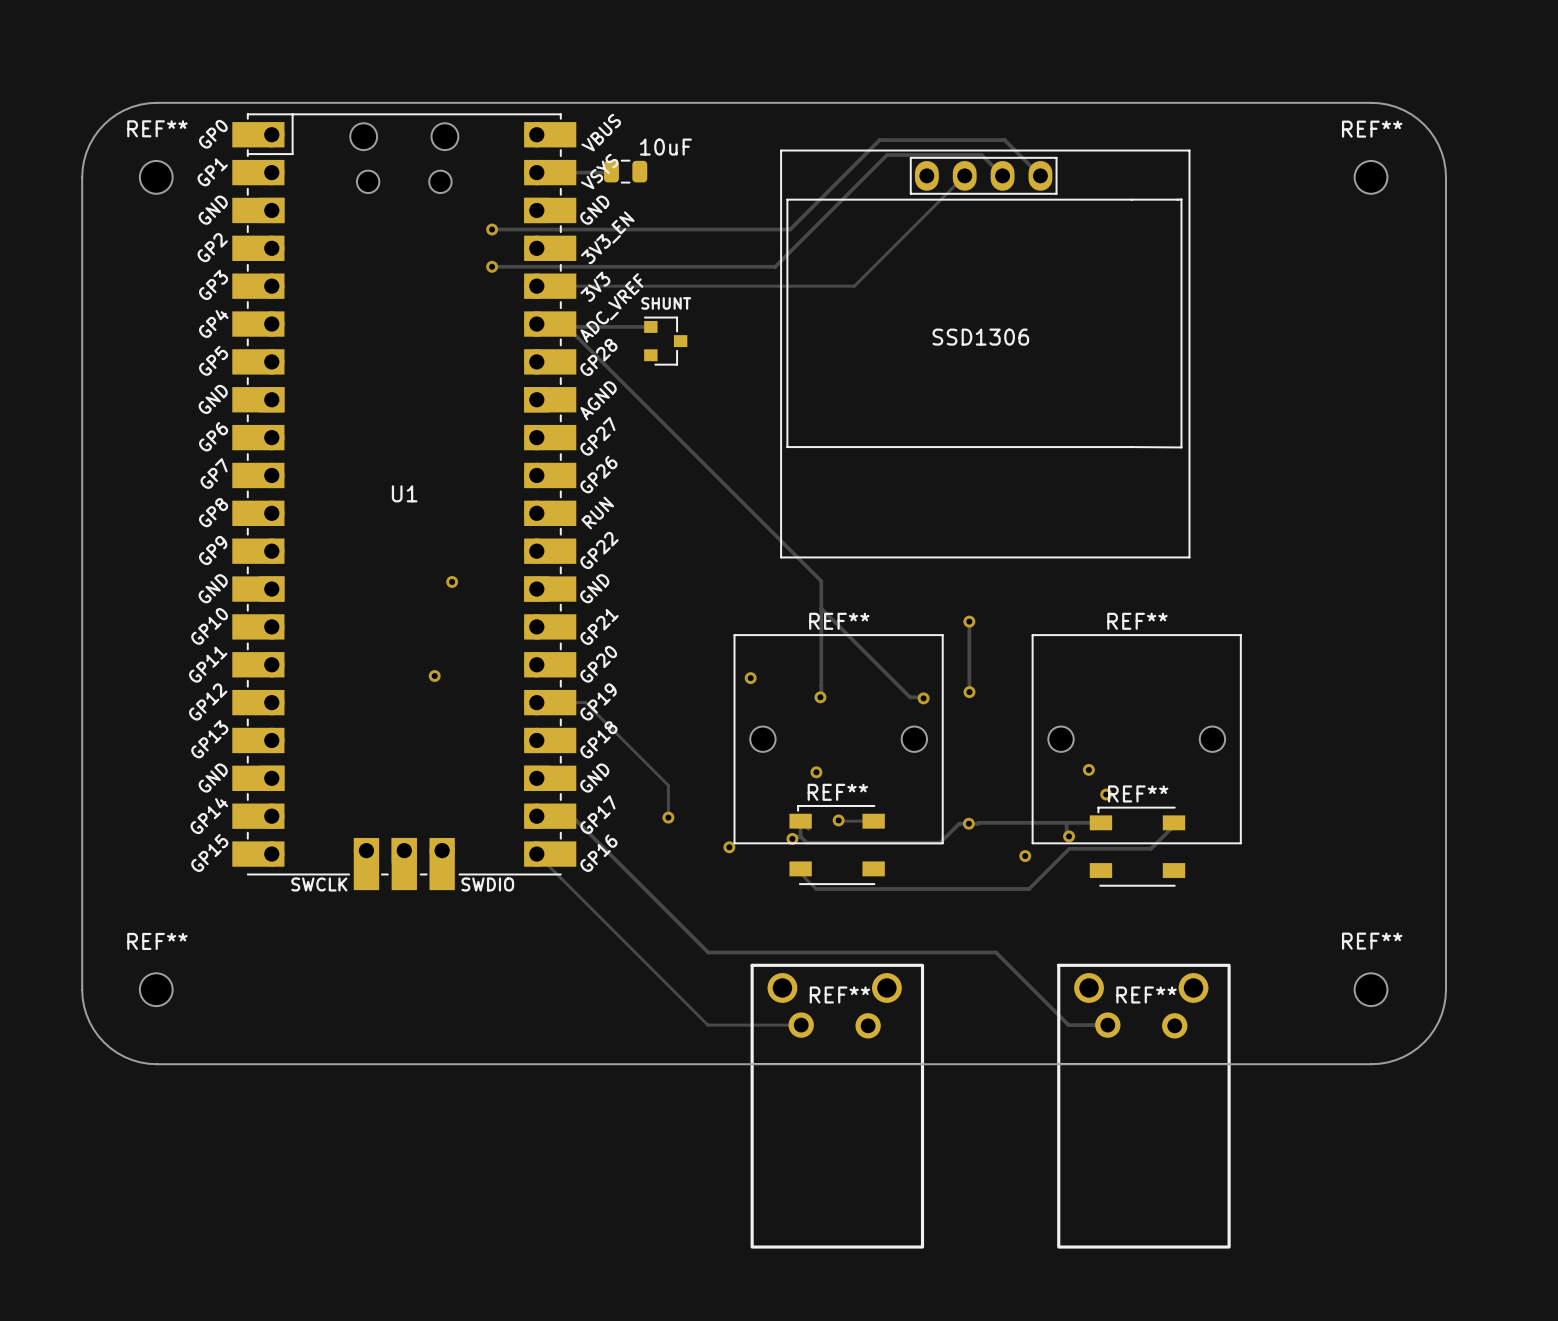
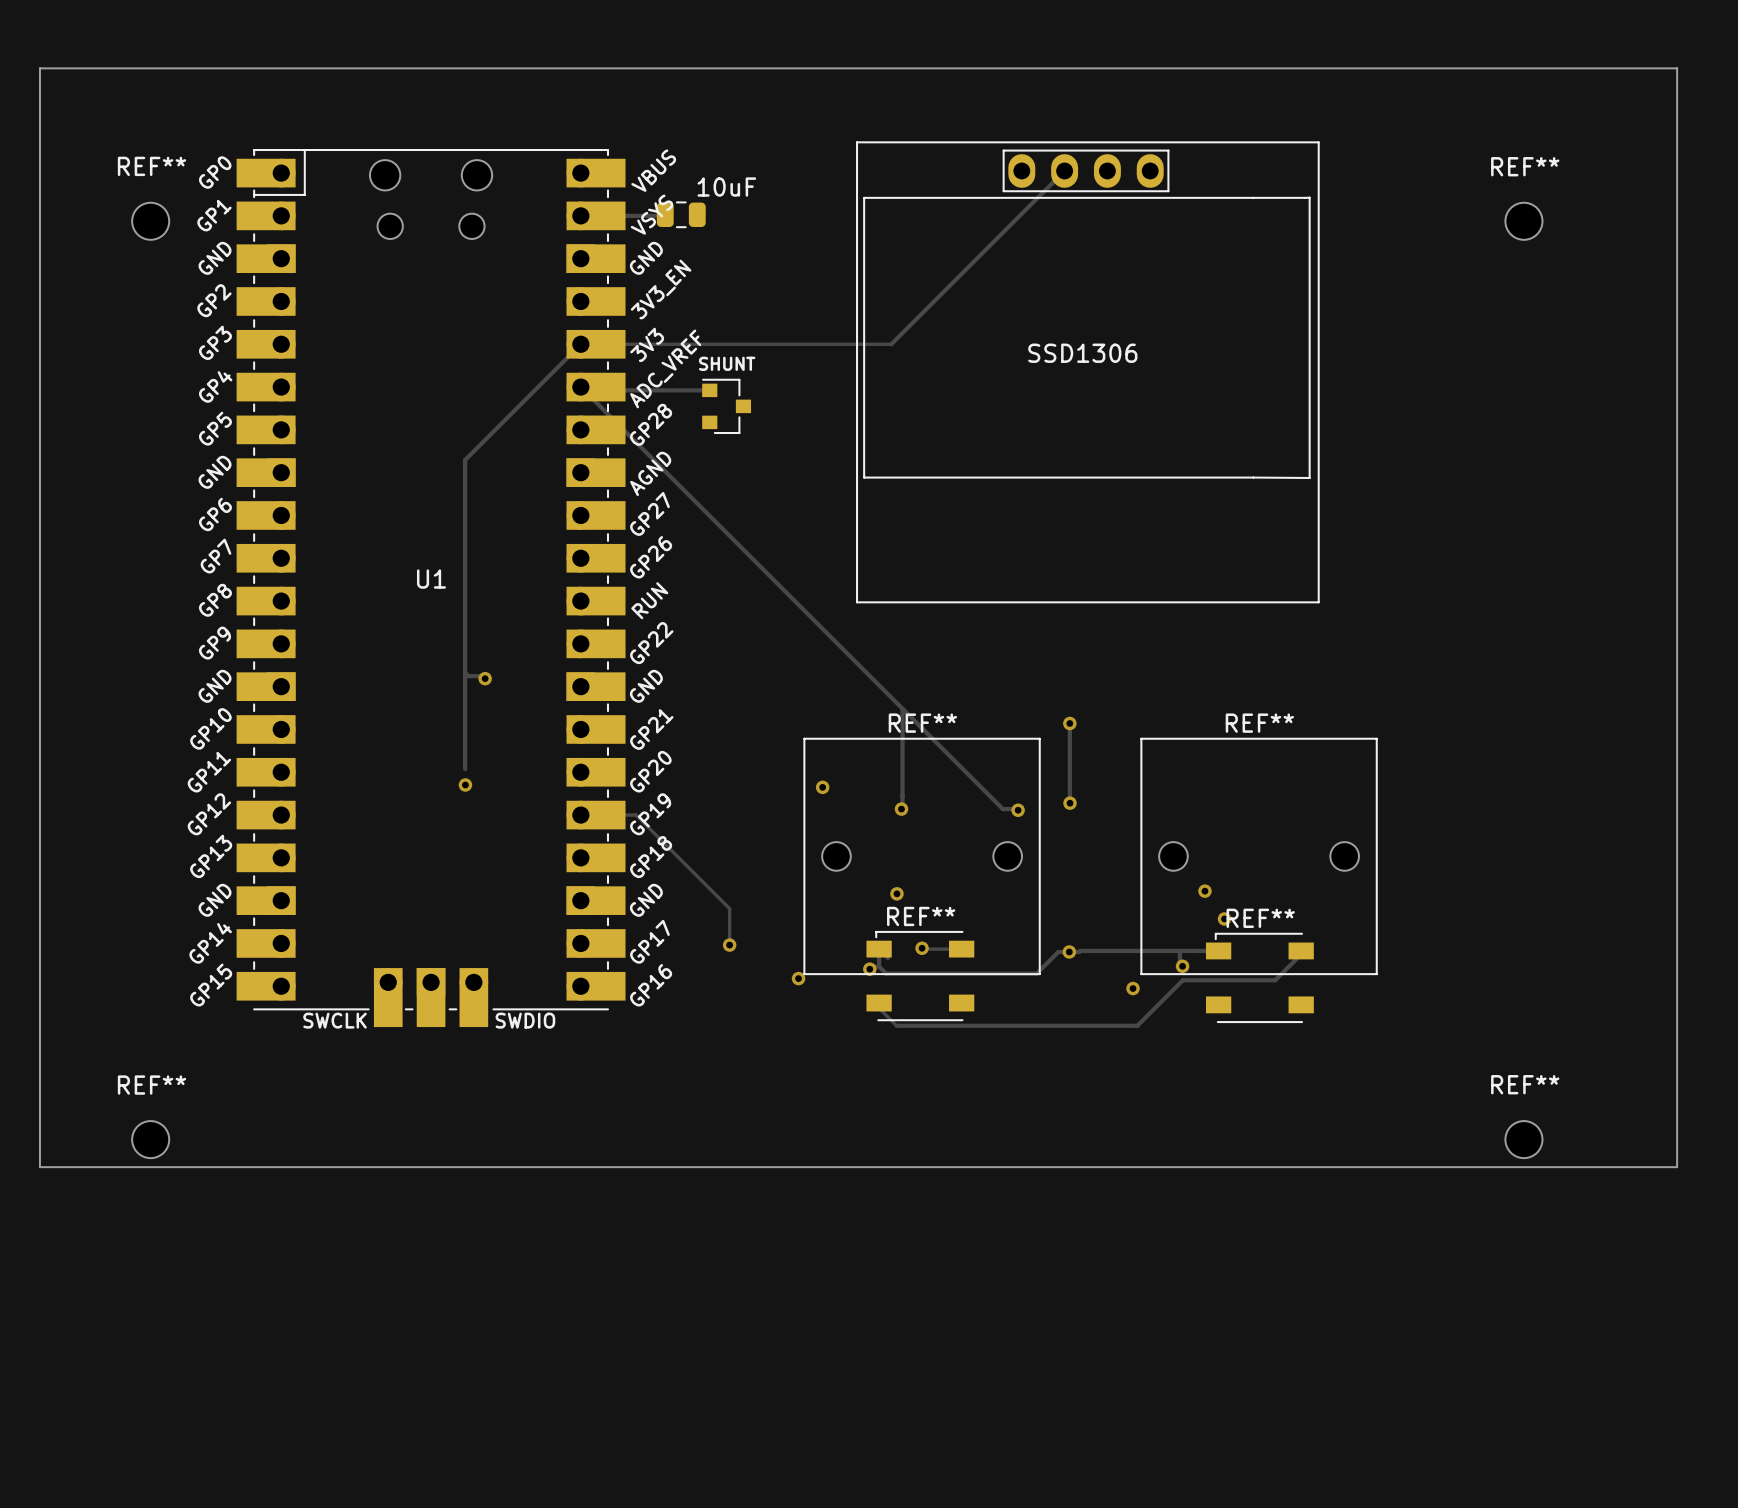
board edge: (156, 102) (1371, 102) (1396, 107) (1417, 119) (1429, 130) (1438, 145) (1444, 160) (1446, 177) (1446, 989) (1441, 1014) (1429, 1036) (1417, 1047) (1403, 1056) (1388, 1062) (1371, 1064) (156, 1064) (132, 1060) (110, 1047) (98, 1036) (89, 1022) (84, 1006) (82, 989) (82, 177) (86, 152) (93, 137) (104, 124) (117, 114) (132, 107) (156, 102) -> (39, 68) (39, 1167) (1677, 1167) (1677, 68) (39, 68)
track: (964, 175) (854, 286) (811, 286) -> (1064, 170) (891, 344)
track: (1002, 175) (981, 155) (887, 155) (775, 266) (492, 266) -> none
track: (1040, 175) (1004, 140) (879, 140) (790, 229) (492, 229) -> none
via: (492, 229) -> none
via: (492, 266) -> none
track: none -> (580, 344) (465, 460) (465, 769)
track: (536, 324) (564, 324) (821, 581) (821, 608) -> (584, 390) (902, 708)
SSD1306 position: (985, 353) -> (1087, 372)
track: none -> (465, 672) (468, 676) (482, 676)
track: (550, 816) (571, 816) (708, 952) (996, 952) (1068, 1025) (1107, 1025) -> none
track: (536, 854) (707, 1025) (801, 1025) -> none
REF**: (837, 1106) -> none
REF**: (1143, 1106) -> none

